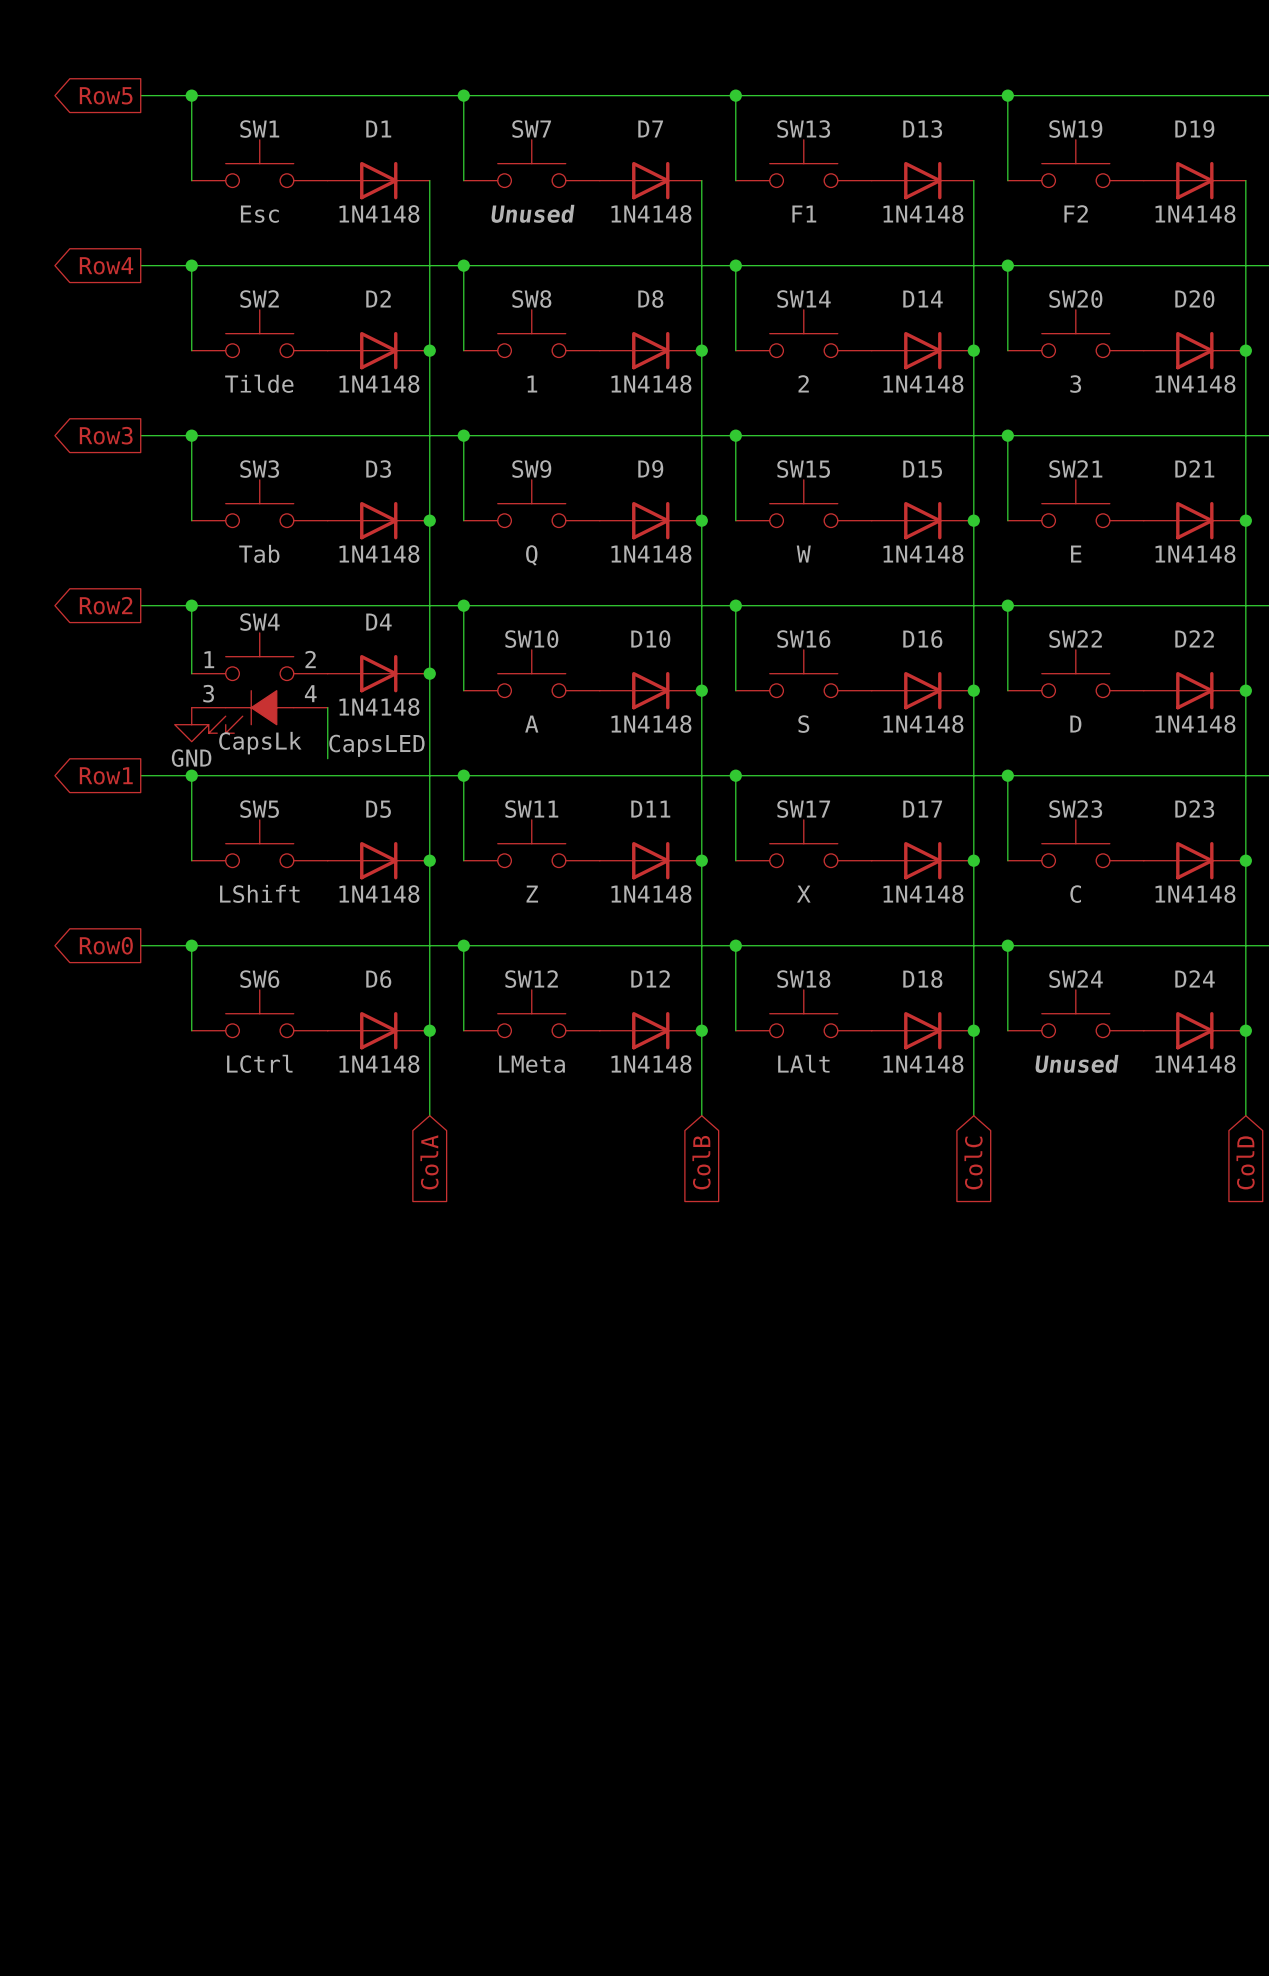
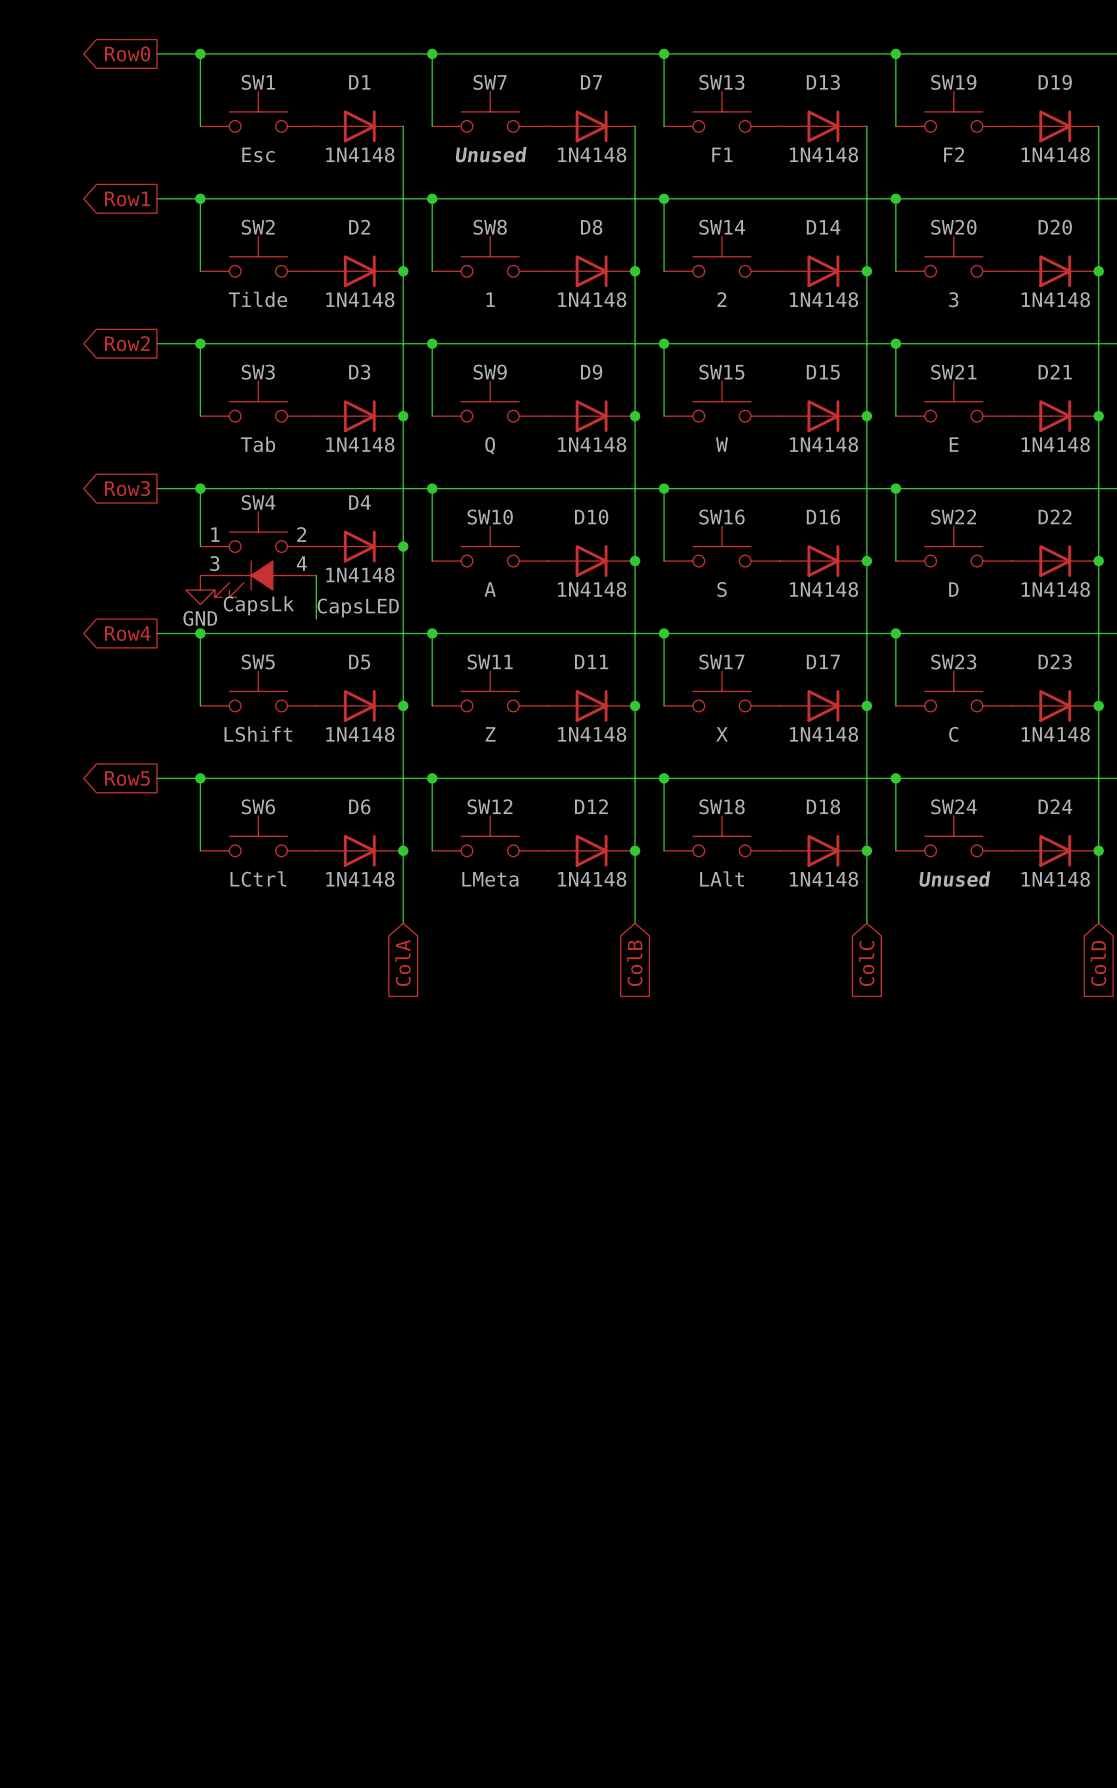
global label: Row5 (106, 95) -> Row0 (127, 53)
global label: Row4 (106, 265) -> Row1 (127, 198)
global label: Row3 (106, 435) -> Row2 (127, 343)
global label: Row2 (106, 605) -> Row3 (127, 488)
global label: Row1 (106, 775) -> Row4 (127, 633)
global label: Row0 (106, 945) -> Row5 (127, 778)

